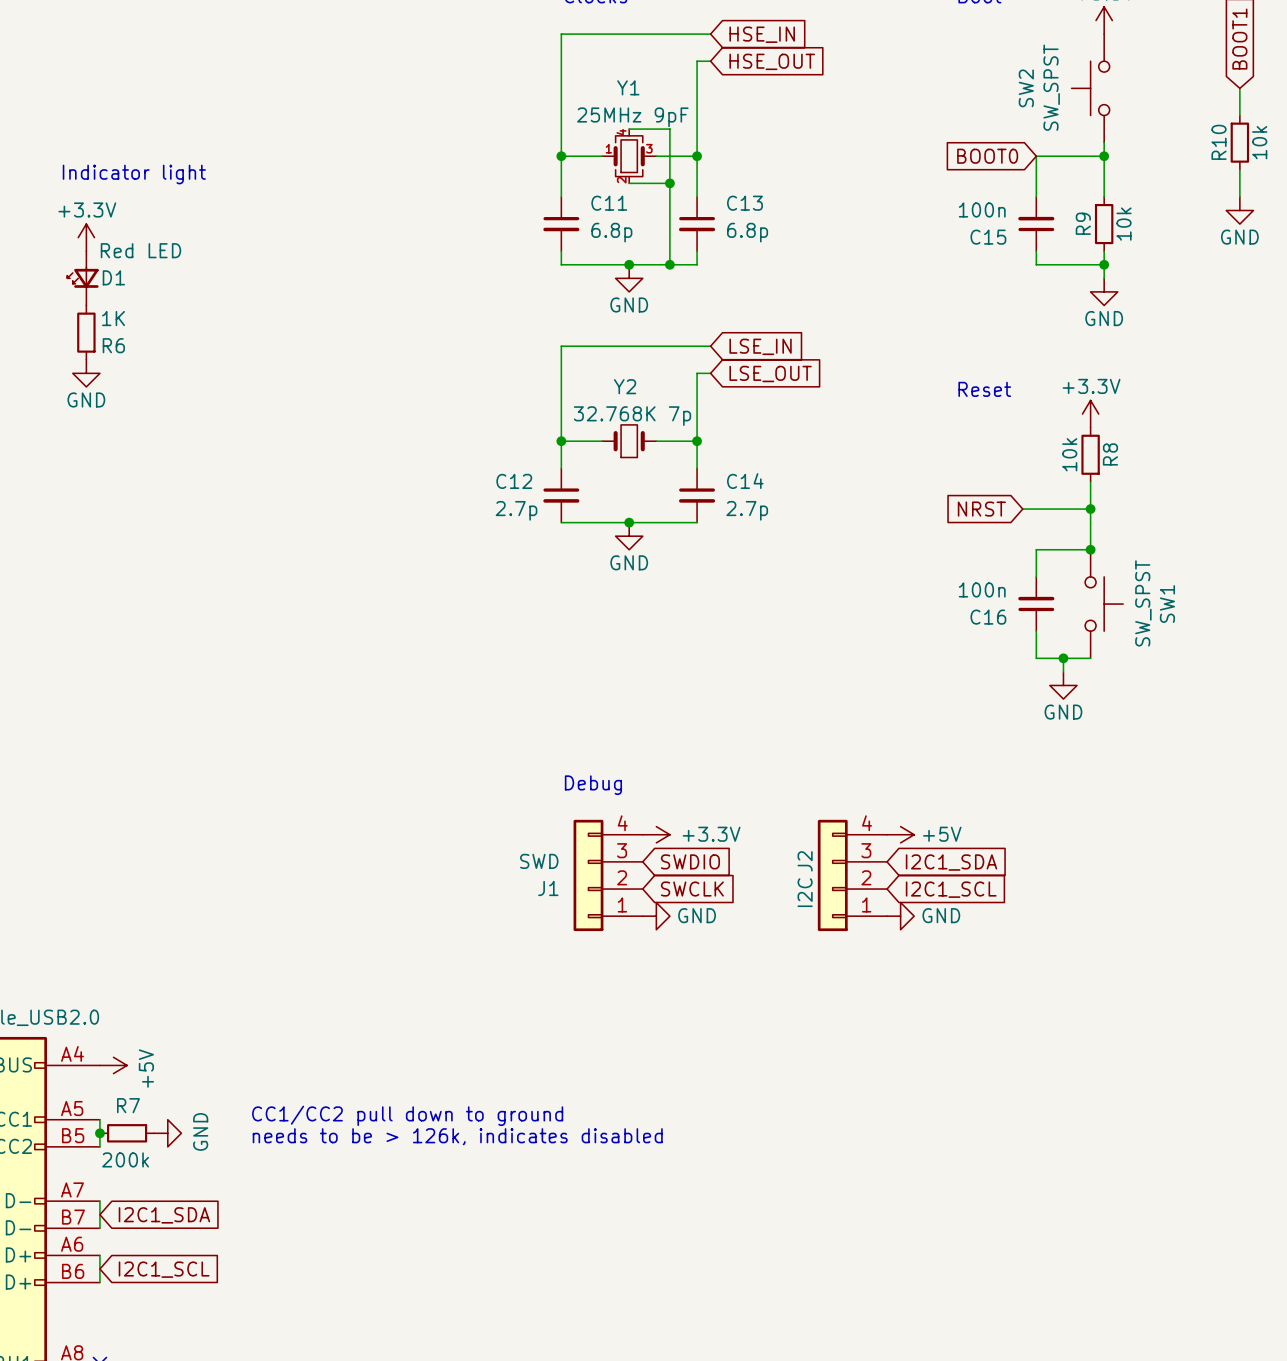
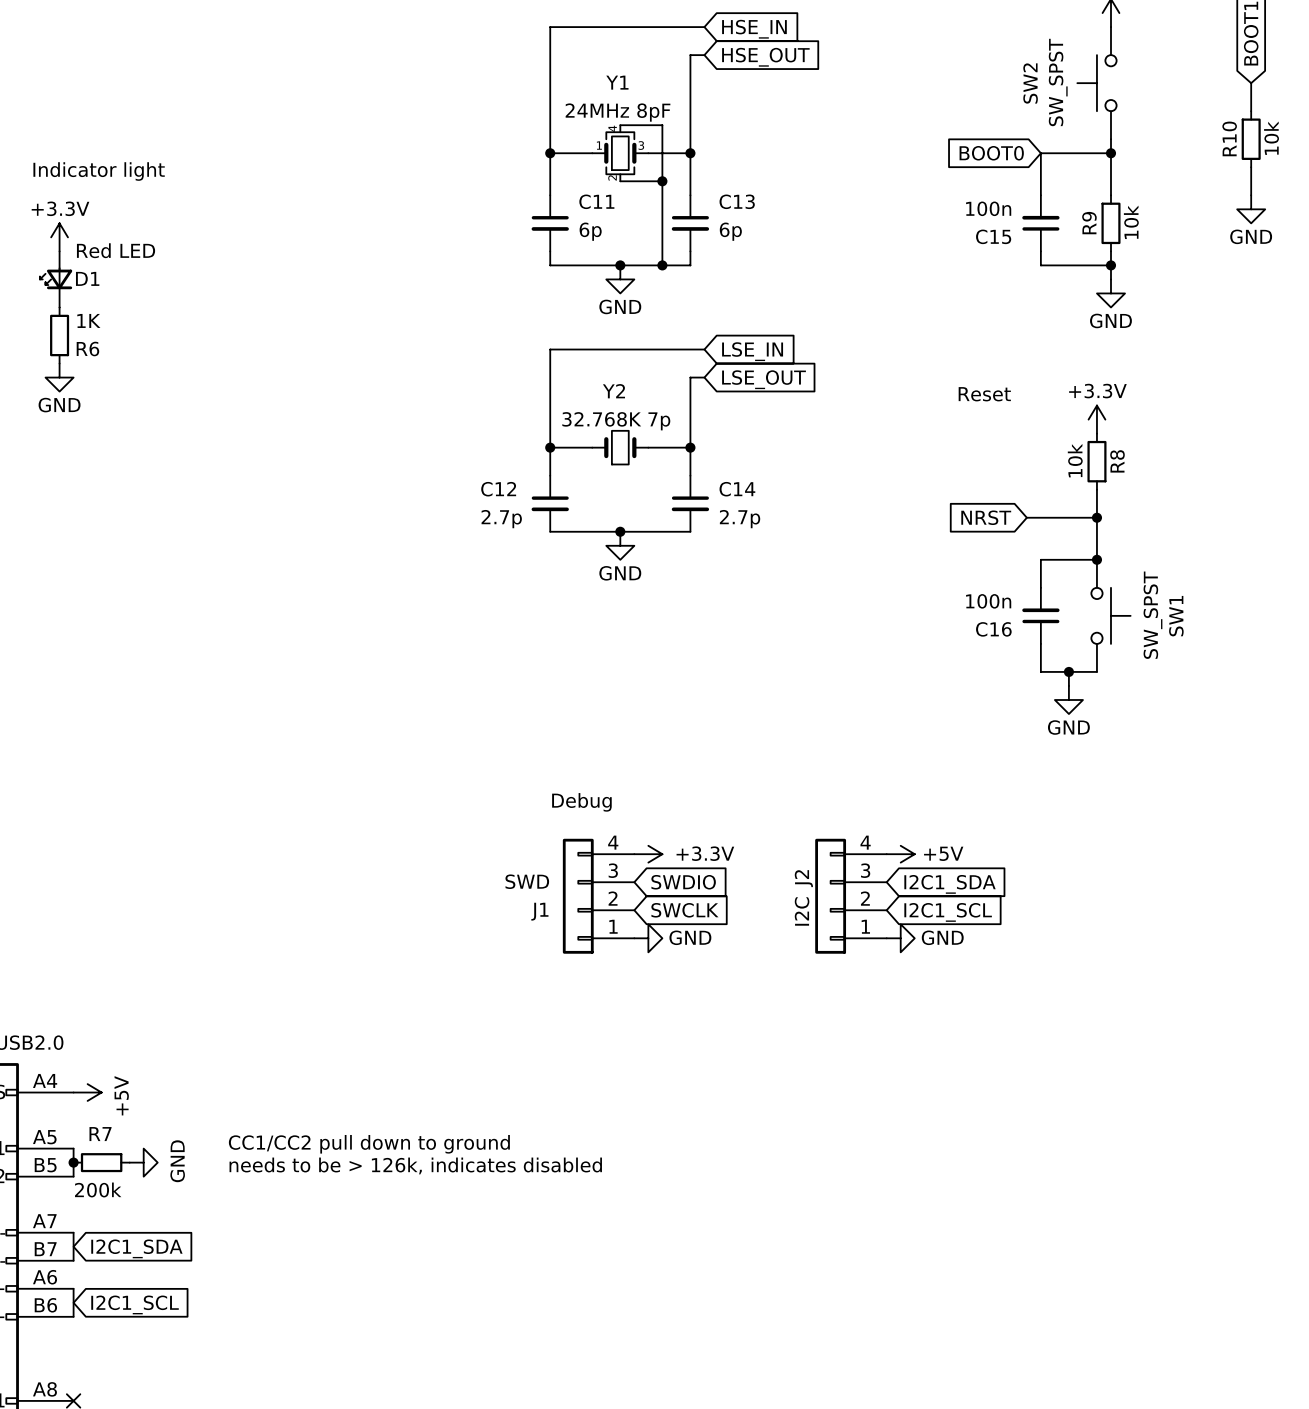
Y1 value: 25MHz 9pF (632, 117) -> 24MHz 8pF (618, 112)
C11 value: 6.8p (611, 232) -> 6p (590, 231)
C13 value: 6.8p (747, 232) -> 6p (730, 231)

